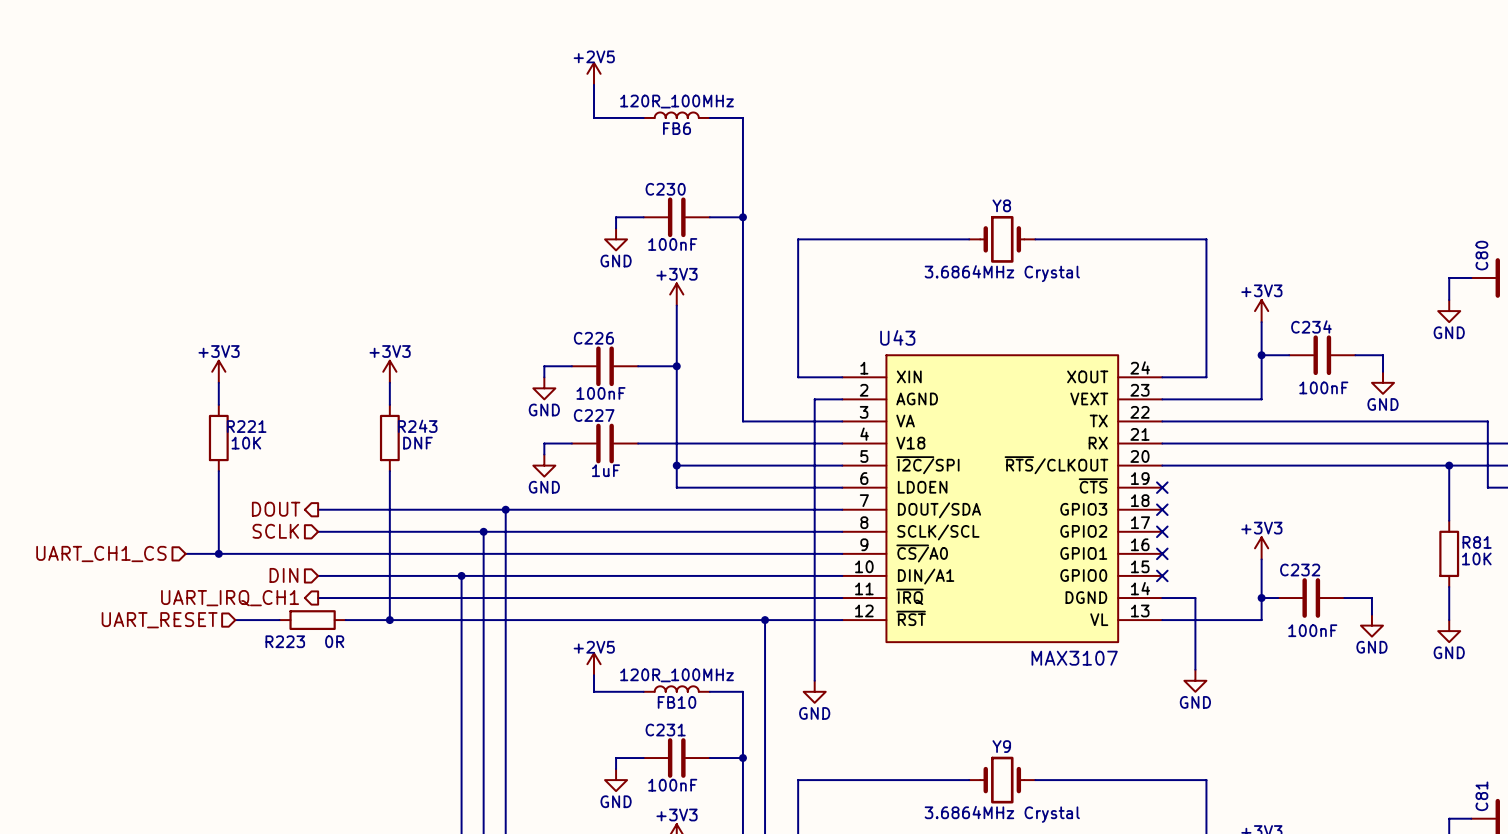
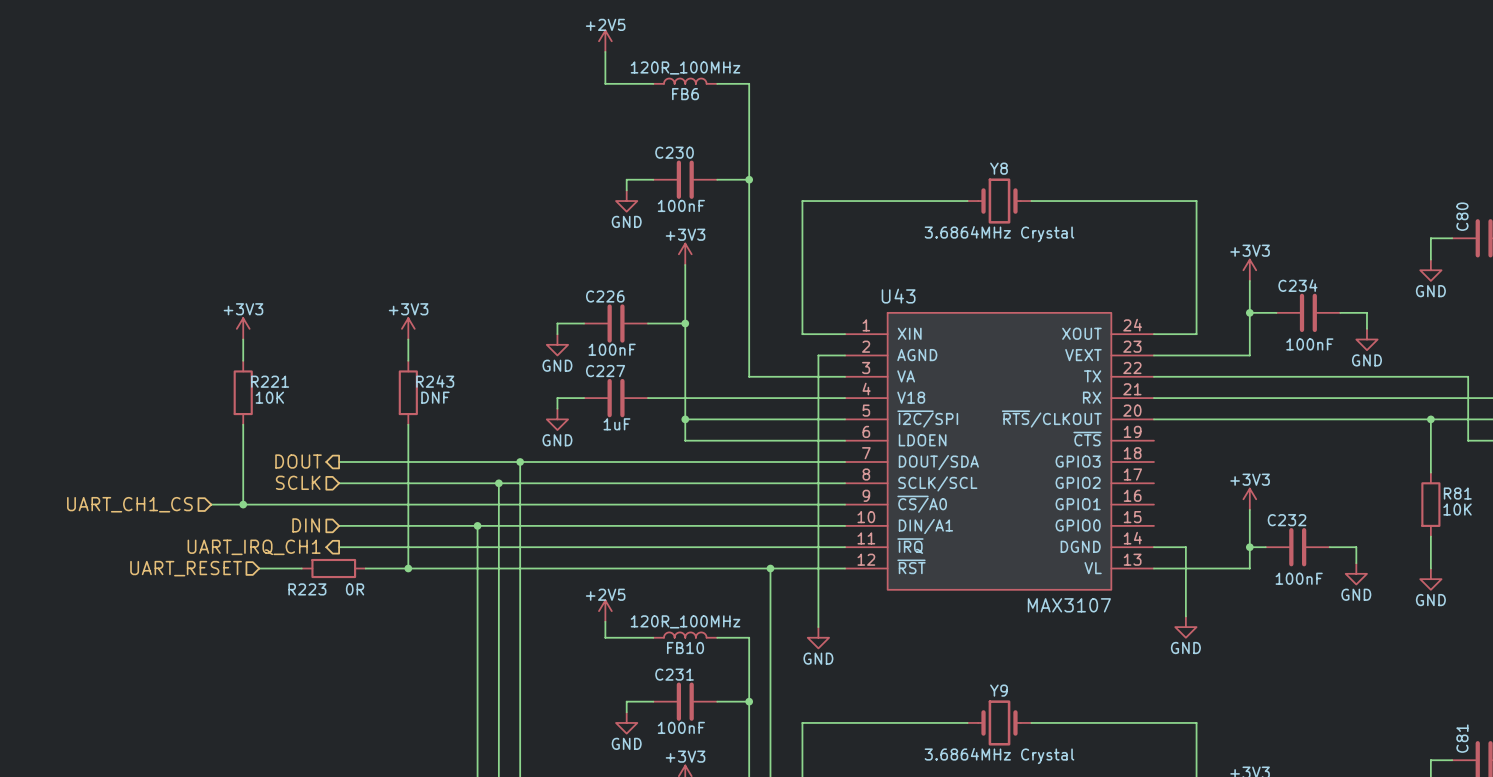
no-connect mark: (1162, 487) -> none
no-connect mark: (1162, 509) -> none
no-connect mark: (1162, 531) -> none
no-connect mark: (1162, 553) -> none
no-connect mark: (1162, 575) -> none

